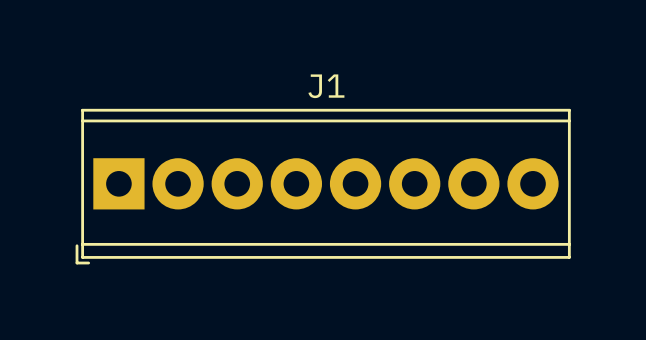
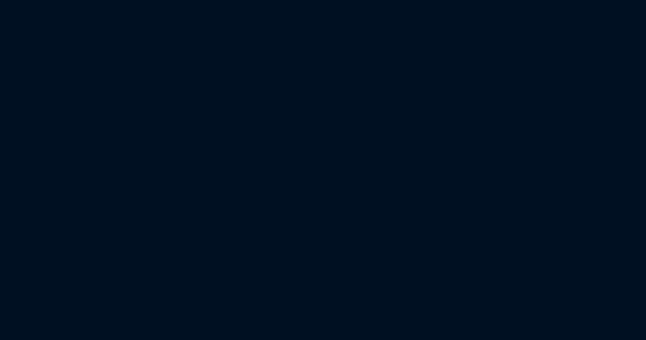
J1: (323, 186) -> none

